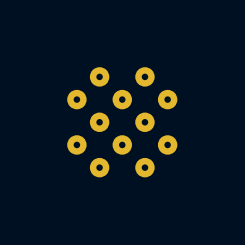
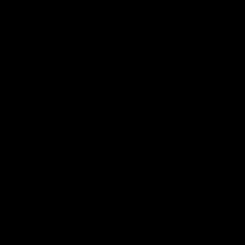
part: (122, 122) -> none

